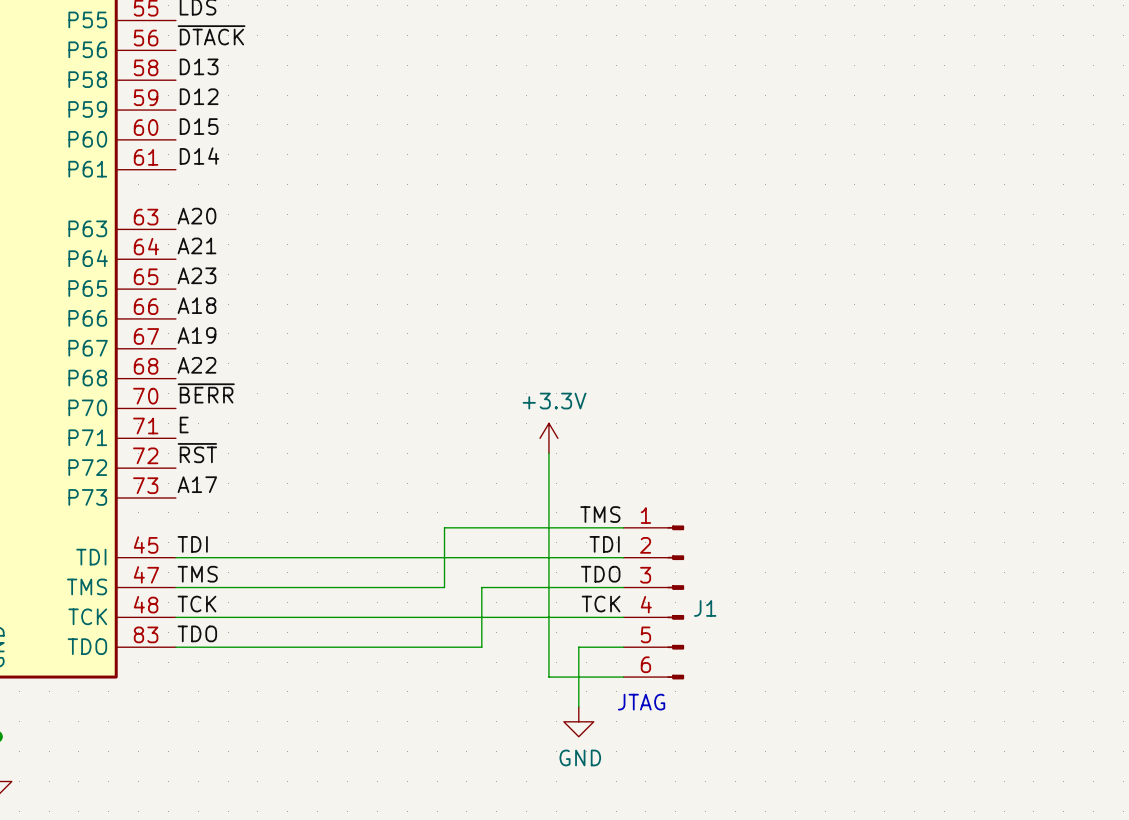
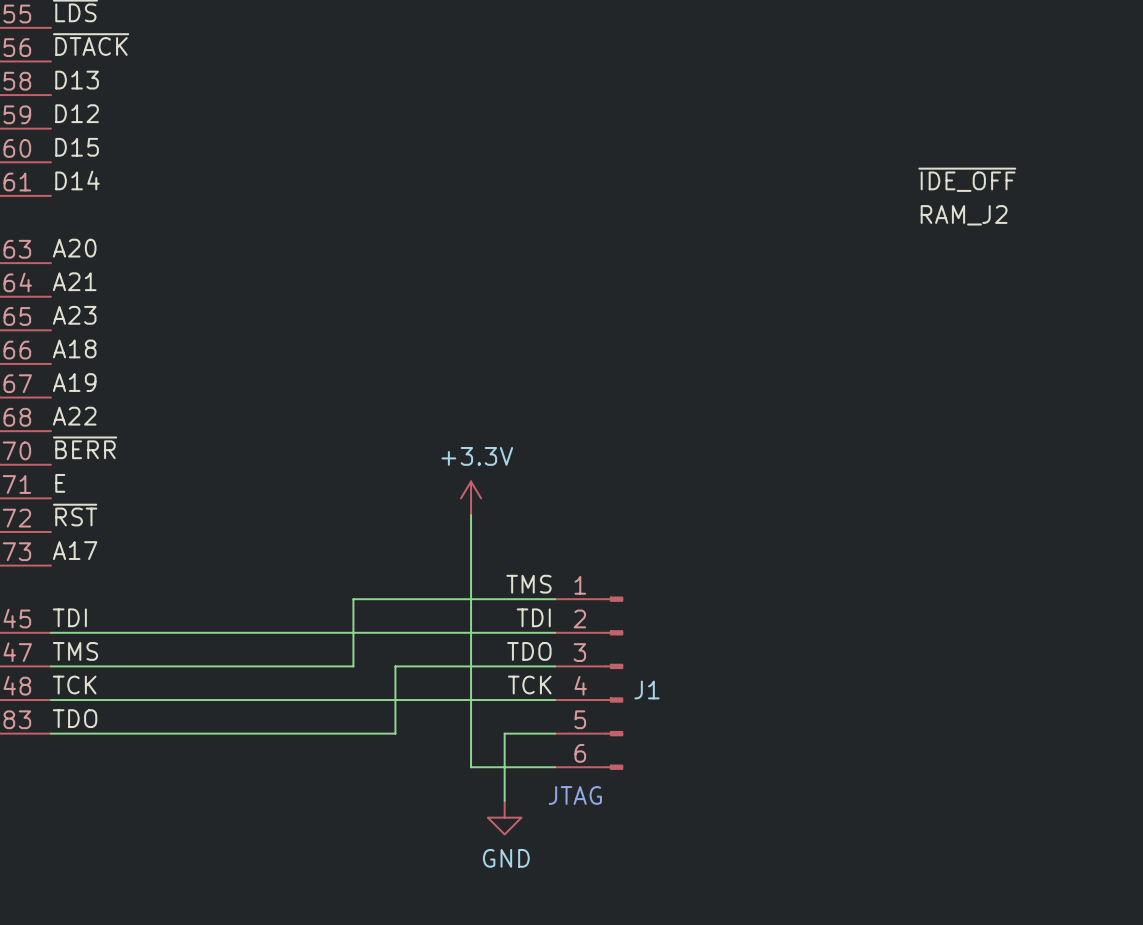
label: none -> ~{IDE_OFF} (967, 179)
label: none -> RAM_J2 (964, 215)

